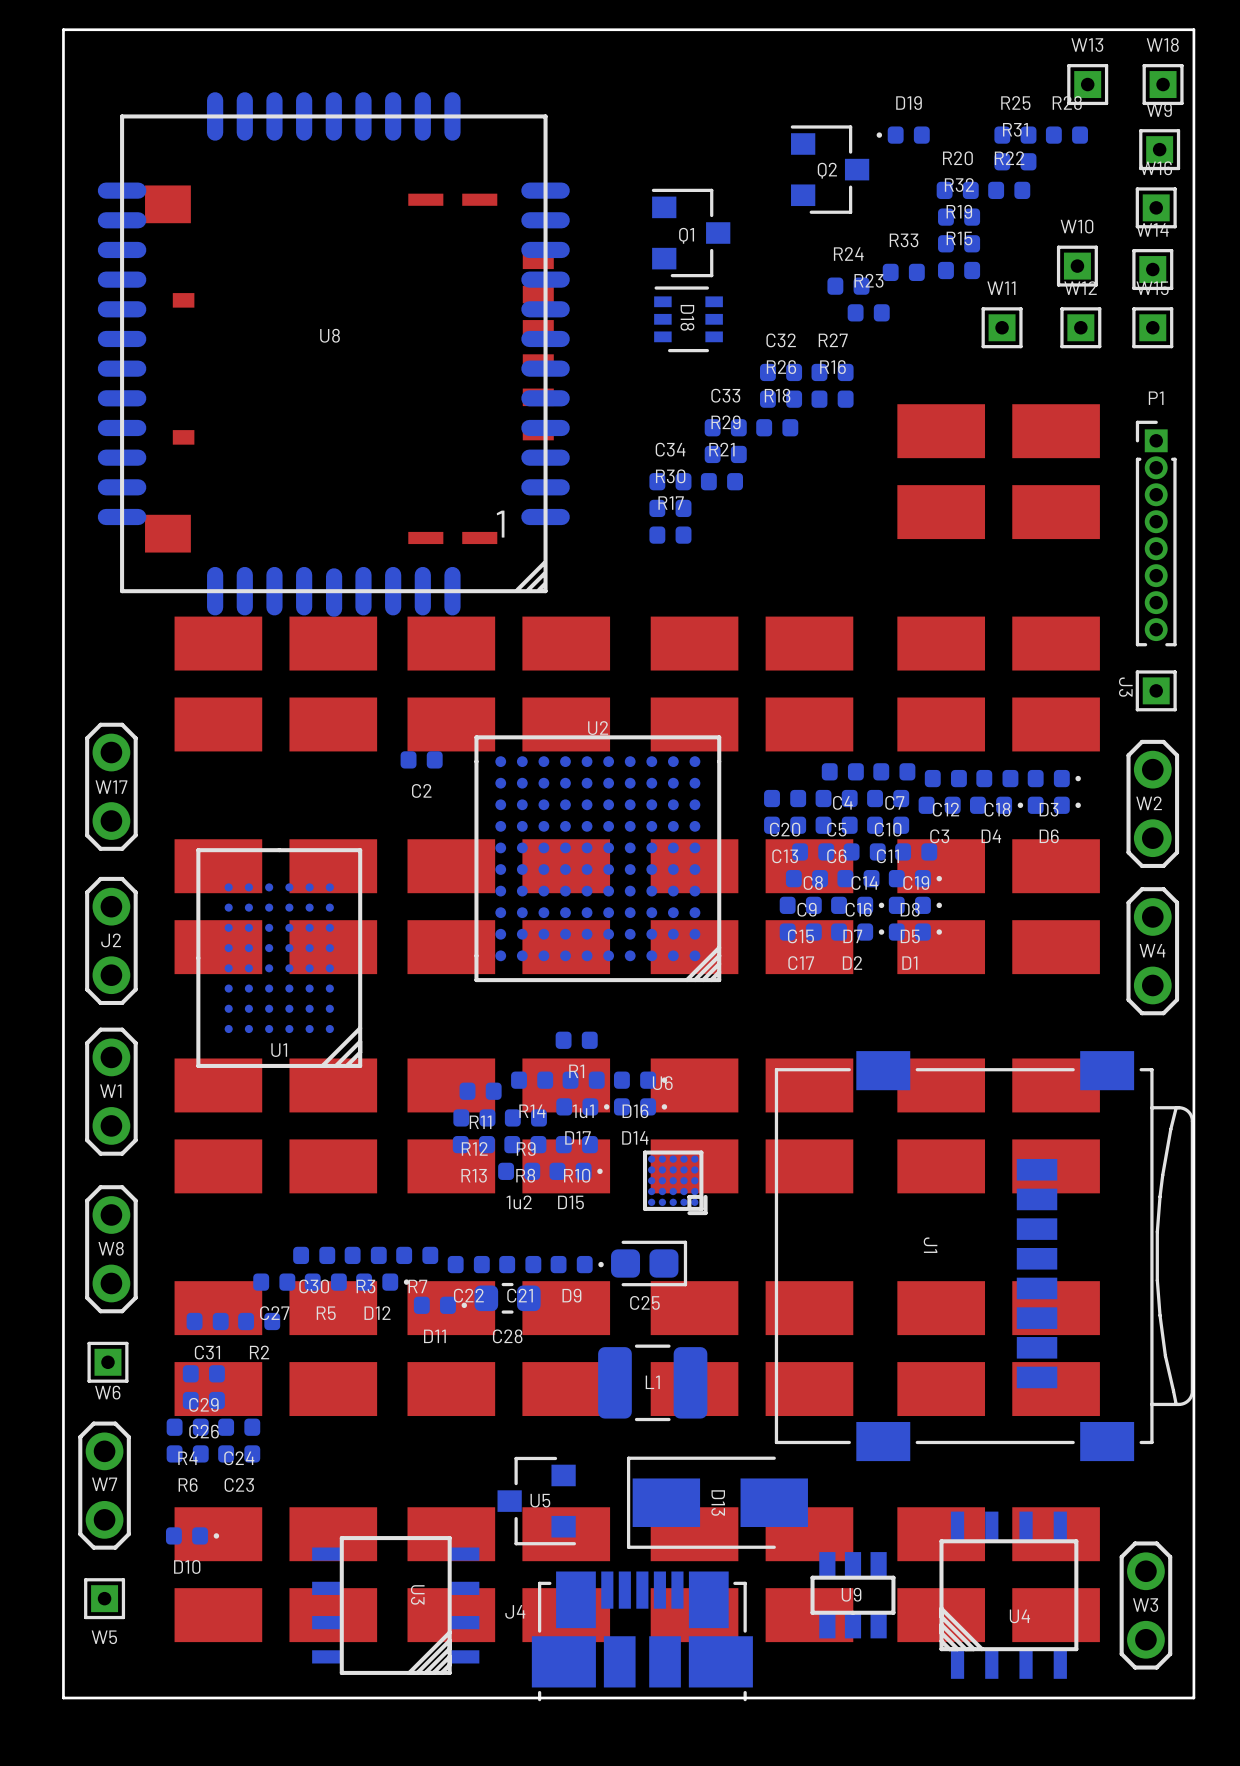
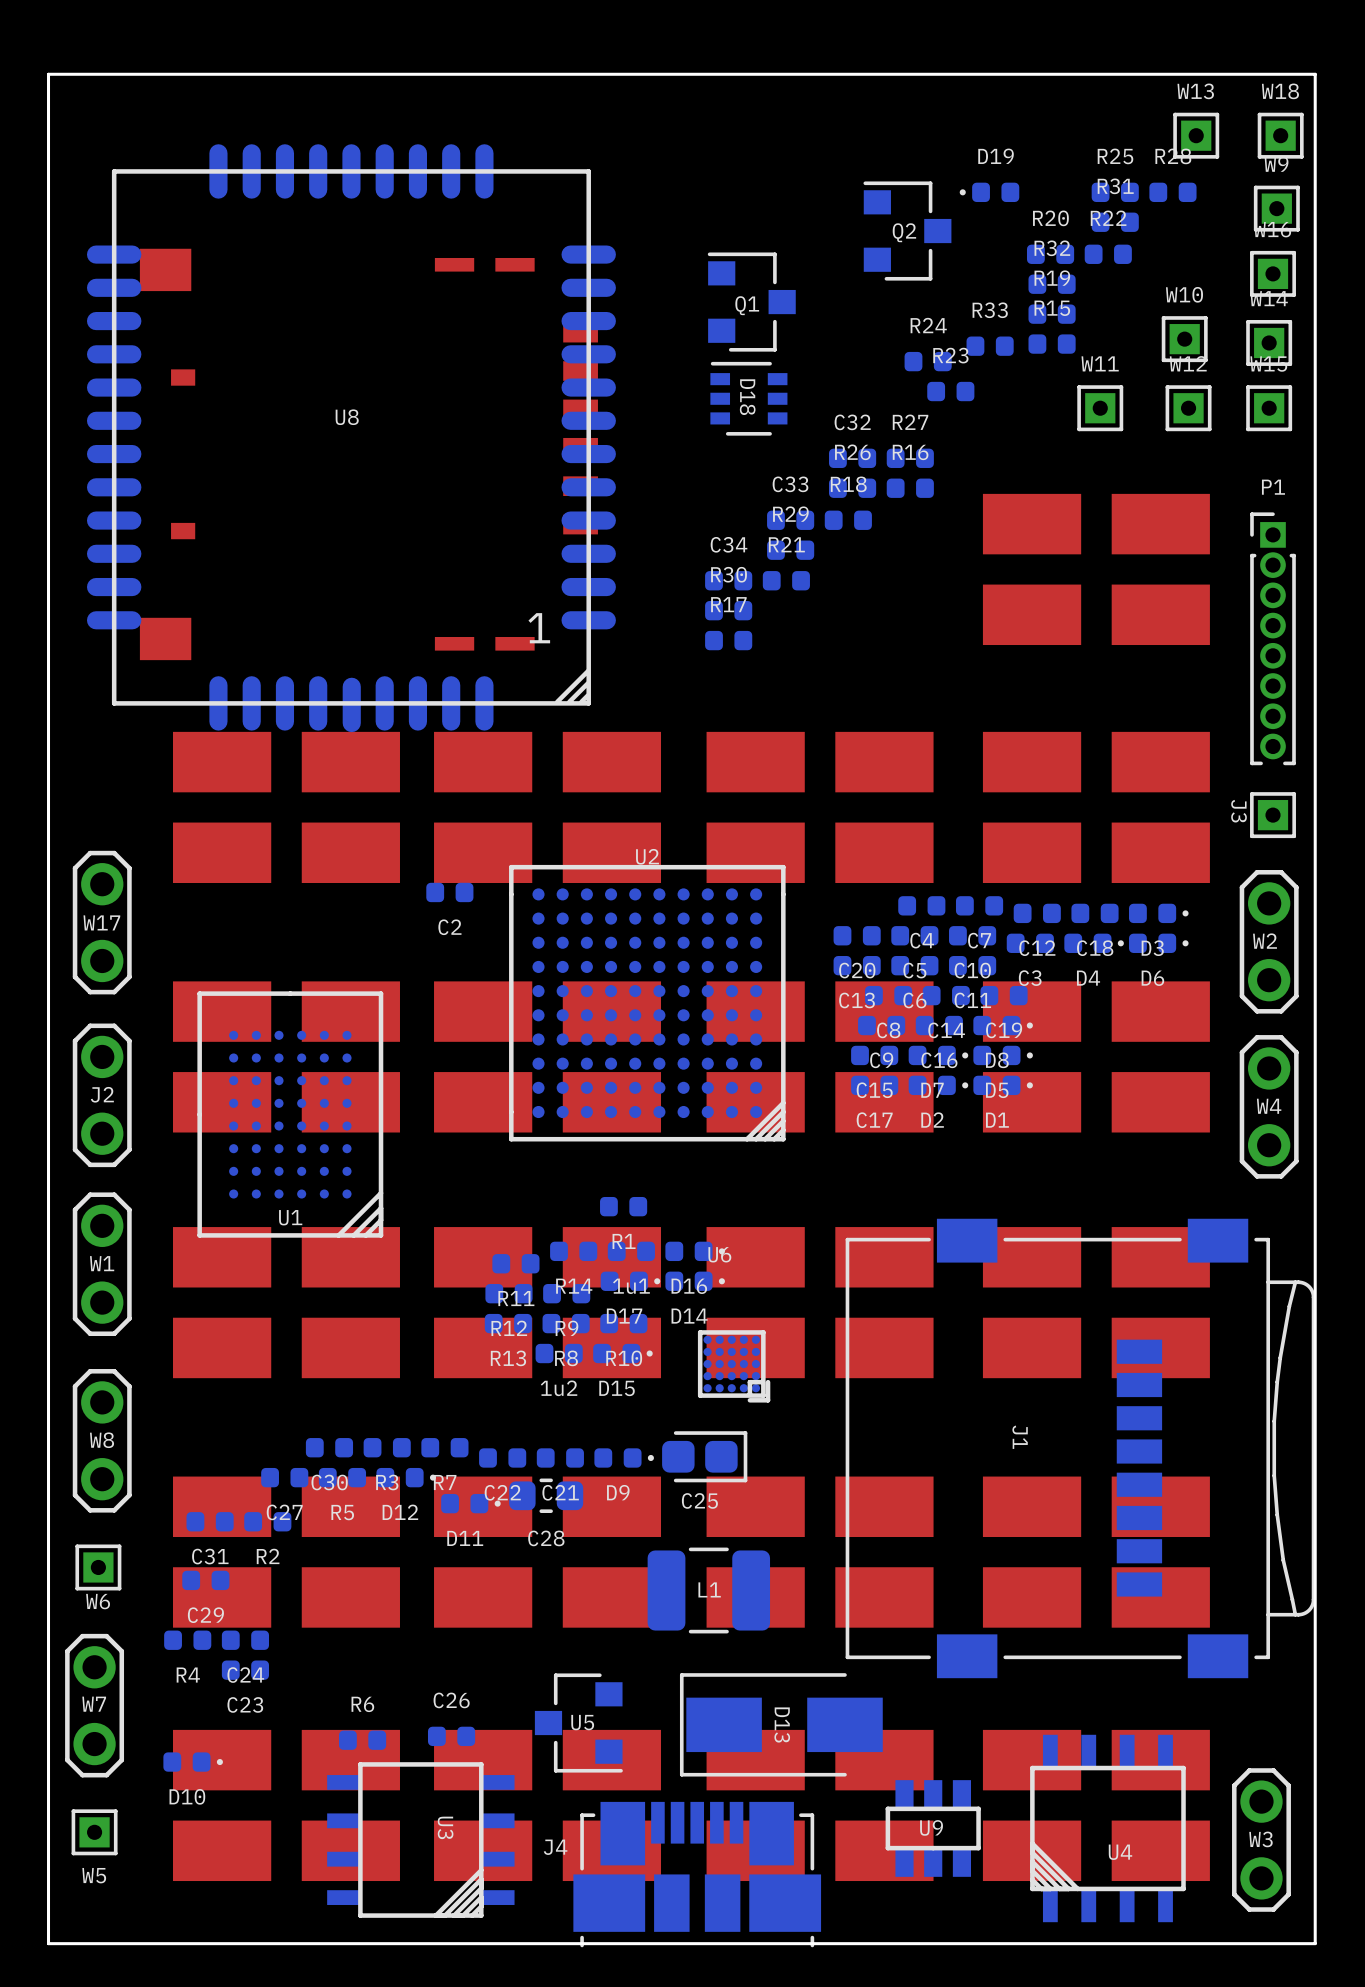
C26 position: (203, 1400) -> (451, 1736)
C26 name position: C26 (204, 1431) -> C26 (451, 1700)
R6 position: (187, 1453) -> (362, 1740)
R6 name position: R6 (188, 1484) -> R6 (362, 1704)

